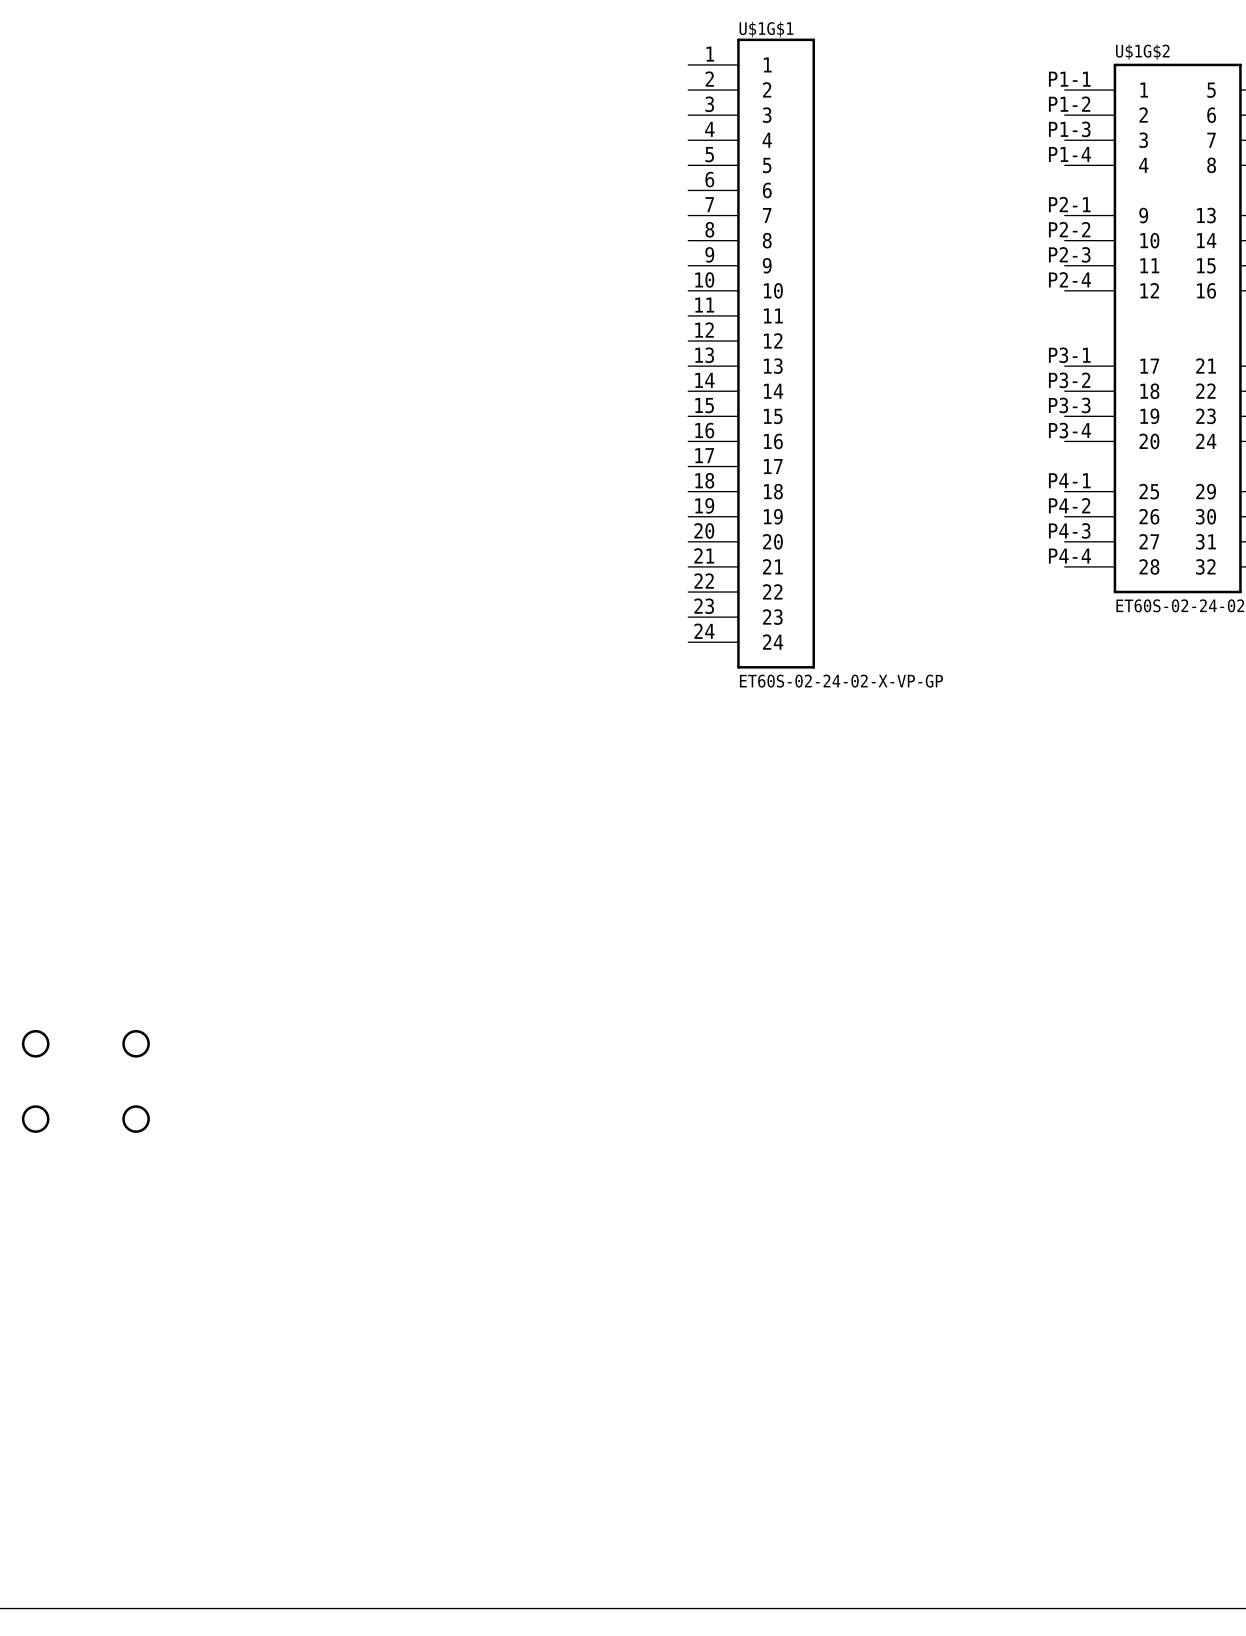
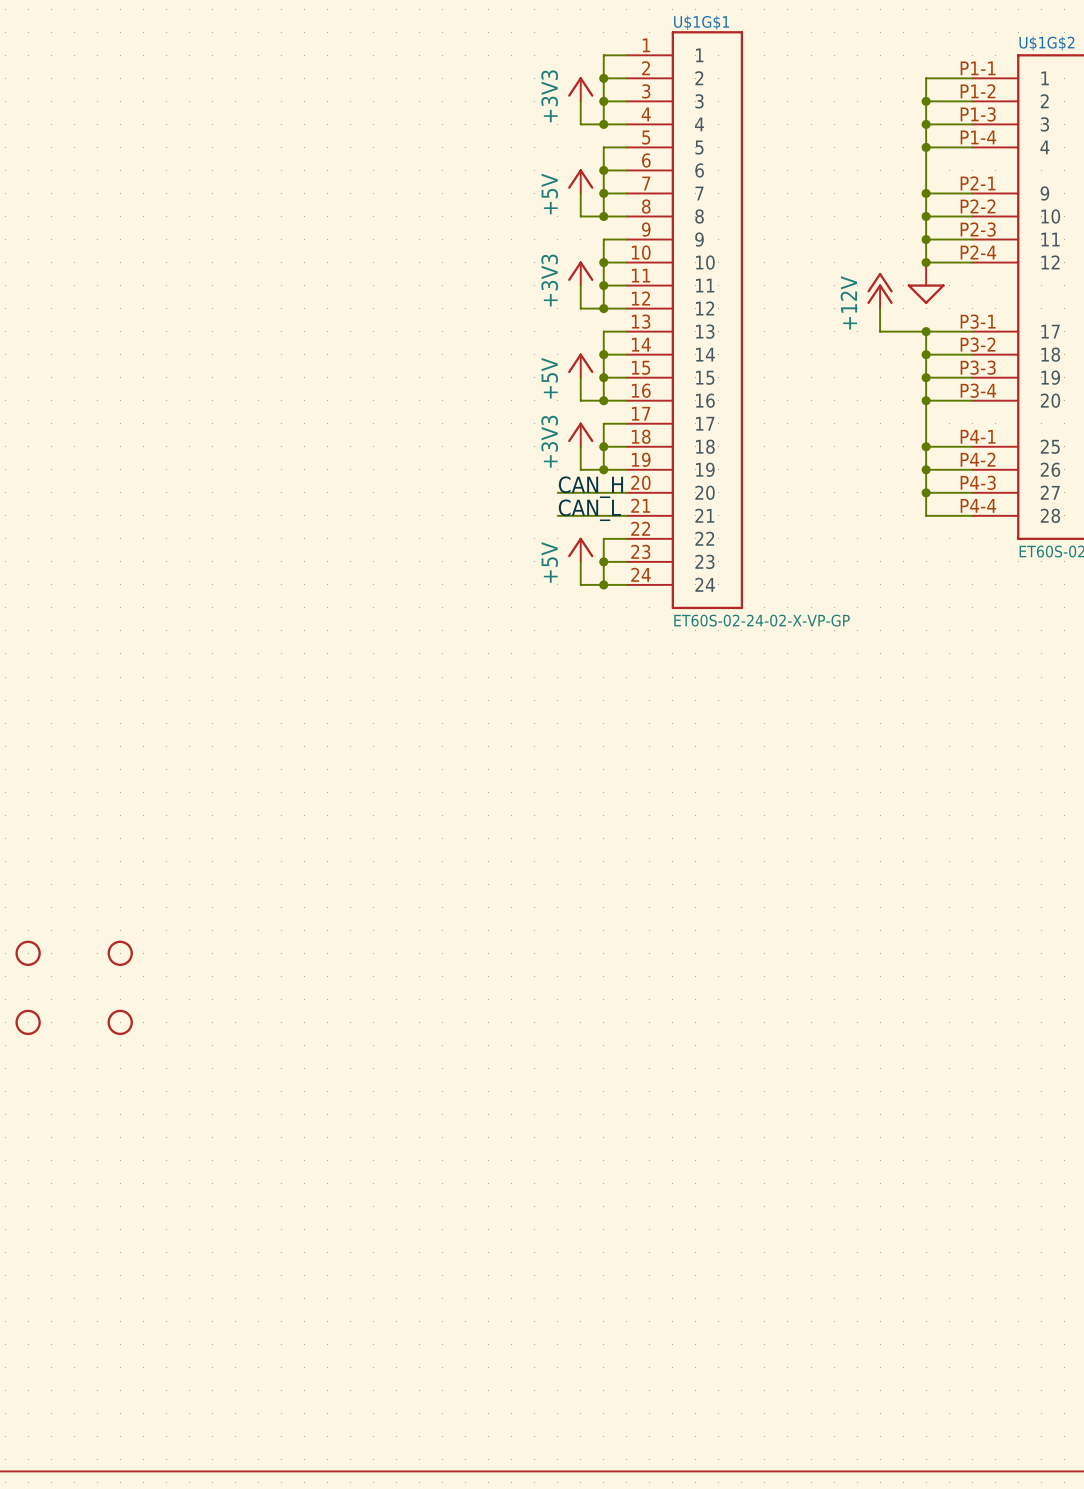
wire: none -> (626, 55) (603, 55) (603, 124)
wire: none -> (603, 78) (626, 78)
junction: none -> (603, 78)
wire: none -> (972, 78) (926, 78) (926, 262) (972, 262)
power symbol: none -> +3V3 (580, 89)
wire: none -> (580, 101) (580, 124) (626, 124)
wire: none -> (603, 101) (626, 101)
junction: none -> (603, 101)
wire: none -> (926, 101) (972, 101)
junction: none -> (926, 101)
junction: none -> (603, 124)
wire: none -> (926, 124) (972, 124)
junction: none -> (926, 124)
wire: none -> (626, 147) (603, 147) (603, 216)
wire: none -> (926, 147) (972, 147)
junction: none -> (926, 147)
wire: none -> (603, 170) (626, 170)
junction: none -> (603, 170)
power symbol: none -> +5V (580, 181)
wire: none -> (580, 193) (580, 216) (626, 216)
wire: none -> (603, 193) (626, 193)
junction: none -> (603, 193)
wire: none -> (926, 193) (972, 193)
junction: none -> (926, 193)
junction: none -> (603, 216)
wire: none -> (926, 216) (972, 216)
junction: none -> (926, 216)
wire: none -> (626, 239) (603, 239) (603, 308)
wire: none -> (926, 239) (972, 239)
junction: none -> (926, 239)
wire: none -> (603, 262) (626, 262)
junction: none -> (603, 262)
junction: none -> (926, 262)
power symbol: none -> +3V3 (580, 273)
power symbol: none -> (926, 283)
wire: none -> (580, 285) (580, 308) (626, 308)
wire: none -> (603, 285) (626, 285)
junction: none -> (603, 285)
power symbol: none -> +12V (880, 290)
junction: none -> (603, 308)
wire: none -> (880, 308) (880, 331) (972, 331)
wire: none -> (626, 331) (603, 331) (603, 400)
wire: none -> (926, 331) (926, 515) (972, 515)
junction: none -> (926, 331)
wire: none -> (603, 354) (626, 354)
junction: none -> (603, 354)
wire: none -> (926, 354) (972, 354)
junction: none -> (926, 354)
power symbol: none -> +5V (580, 365)
wire: none -> (580, 377) (580, 400) (626, 400)
wire: none -> (603, 377) (626, 377)
junction: none -> (603, 377)
wire: none -> (926, 377) (972, 377)
junction: none -> (926, 377)
junction: none -> (603, 400)
wire: none -> (926, 400) (972, 400)
junction: none -> (926, 400)
wire: none -> (626, 423) (603, 423) (603, 469)
power symbol: none -> +3V3 (580, 434)
wire: none -> (580, 446) (580, 469) (626, 469)
wire: none -> (603, 446) (626, 446)
junction: none -> (603, 446)
wire: none -> (926, 446) (972, 446)
junction: none -> (926, 446)
junction: none -> (603, 469)
wire: none -> (926, 469) (972, 469)
junction: none -> (926, 469)
label: none -> CAN_H (590, 487)
wire: none -> (557, 492) (626, 492)
wire: none -> (926, 492) (972, 492)
junction: none -> (926, 492)
label: none -> CAN_L (589, 510)
wire: none -> (557, 515) (626, 515)
wire: none -> (626, 538) (603, 538) (603, 584)
power symbol: none -> +5V (580, 549)
wire: none -> (580, 561) (580, 584) (626, 584)
wire: none -> (603, 561) (626, 561)
junction: none -> (603, 561)
junction: none -> (603, 584)

